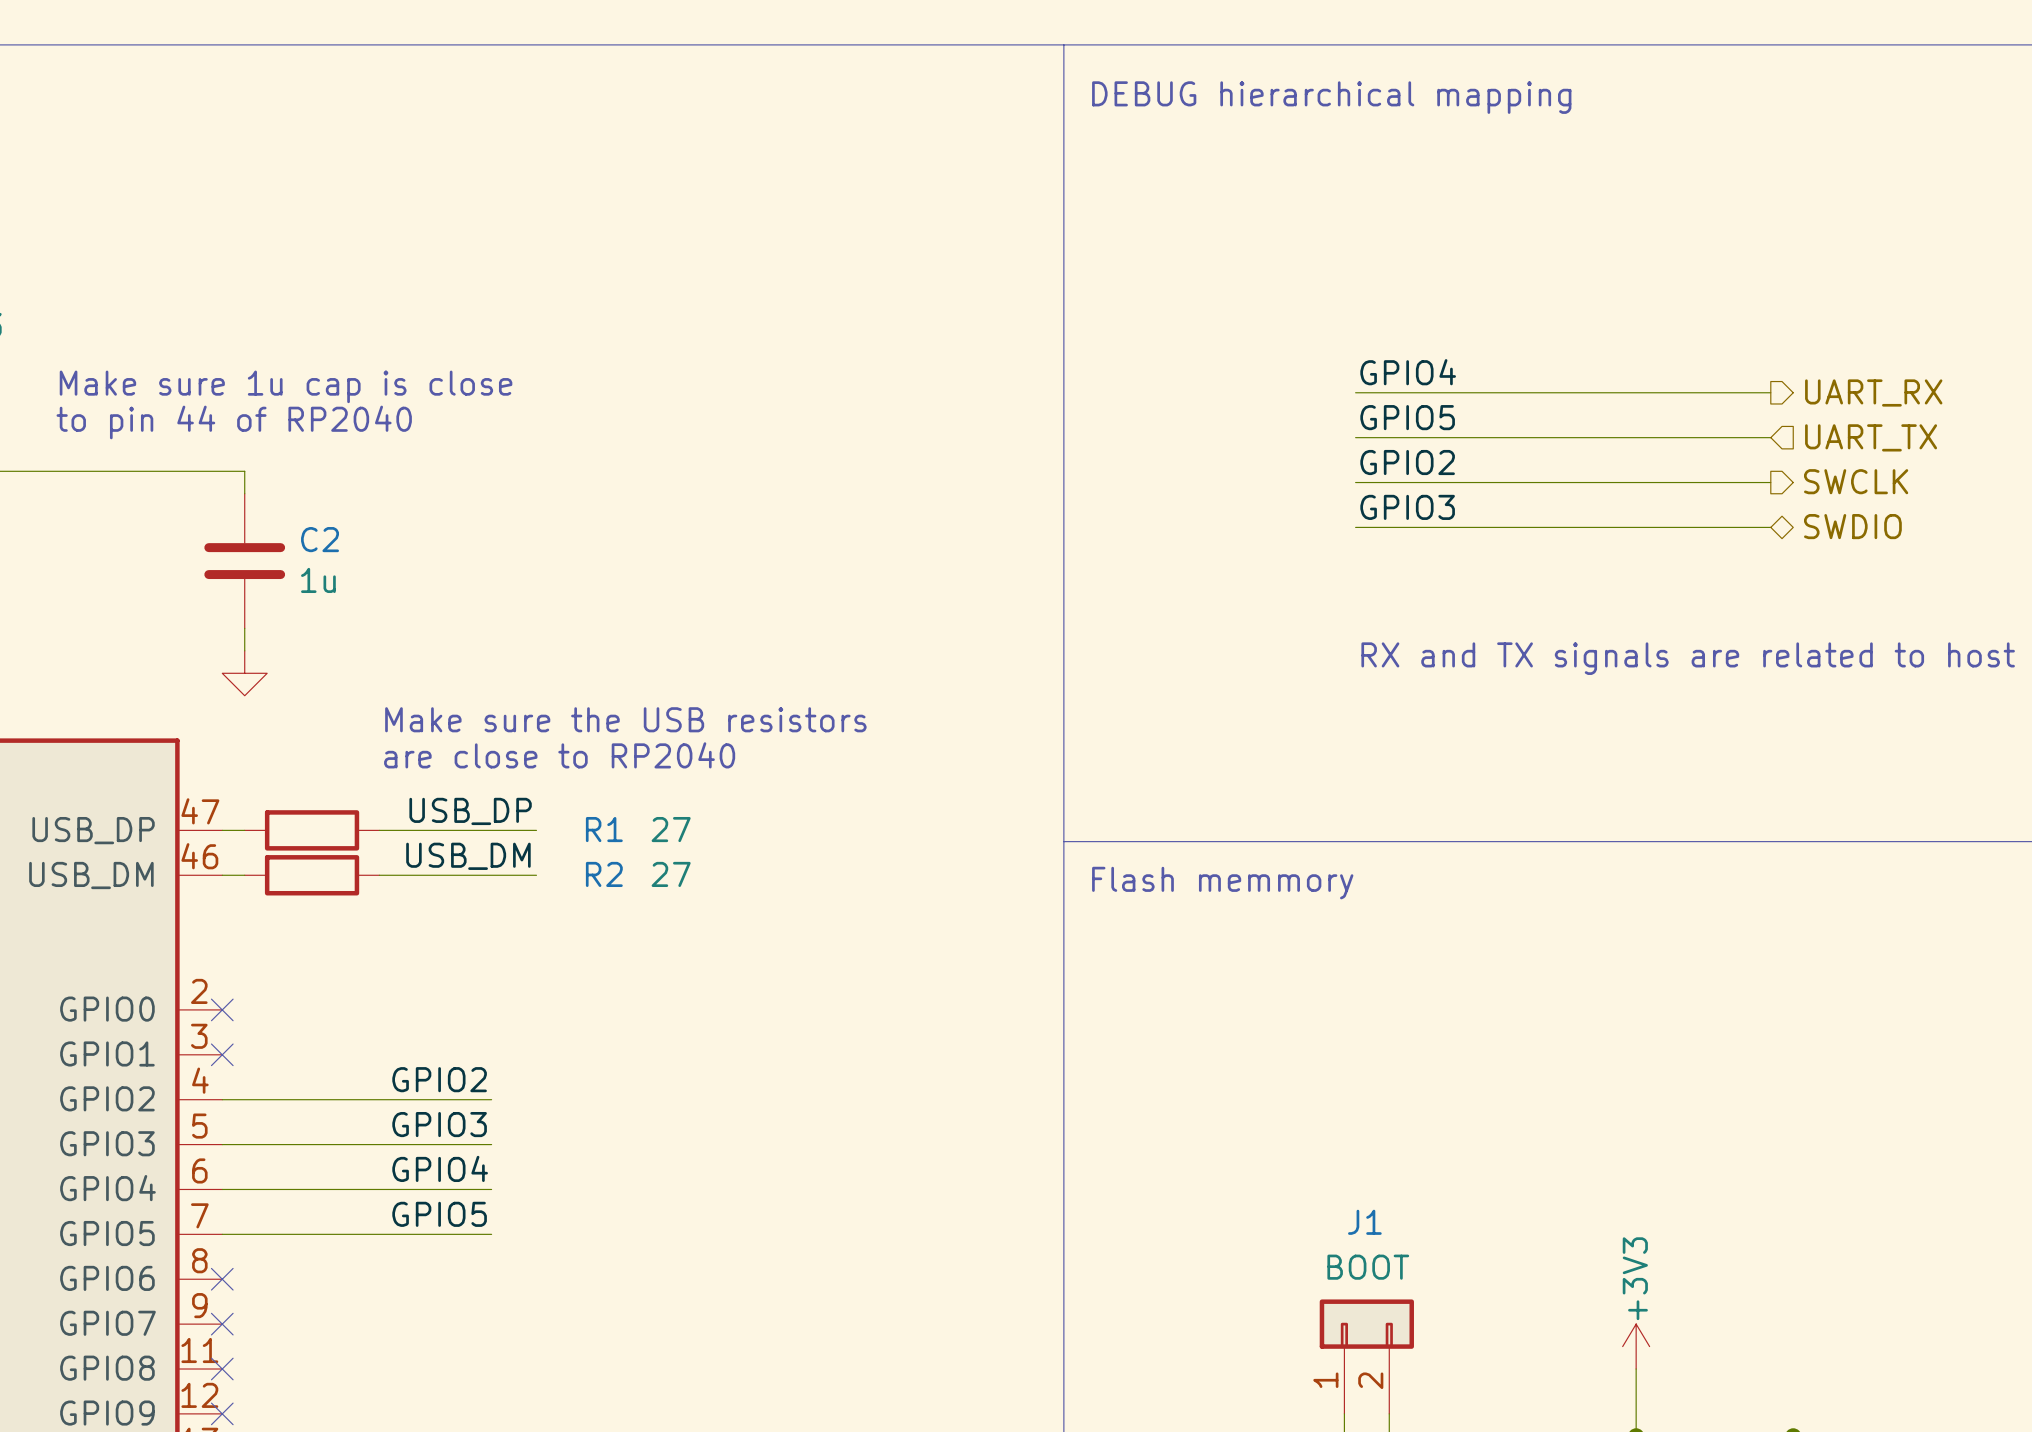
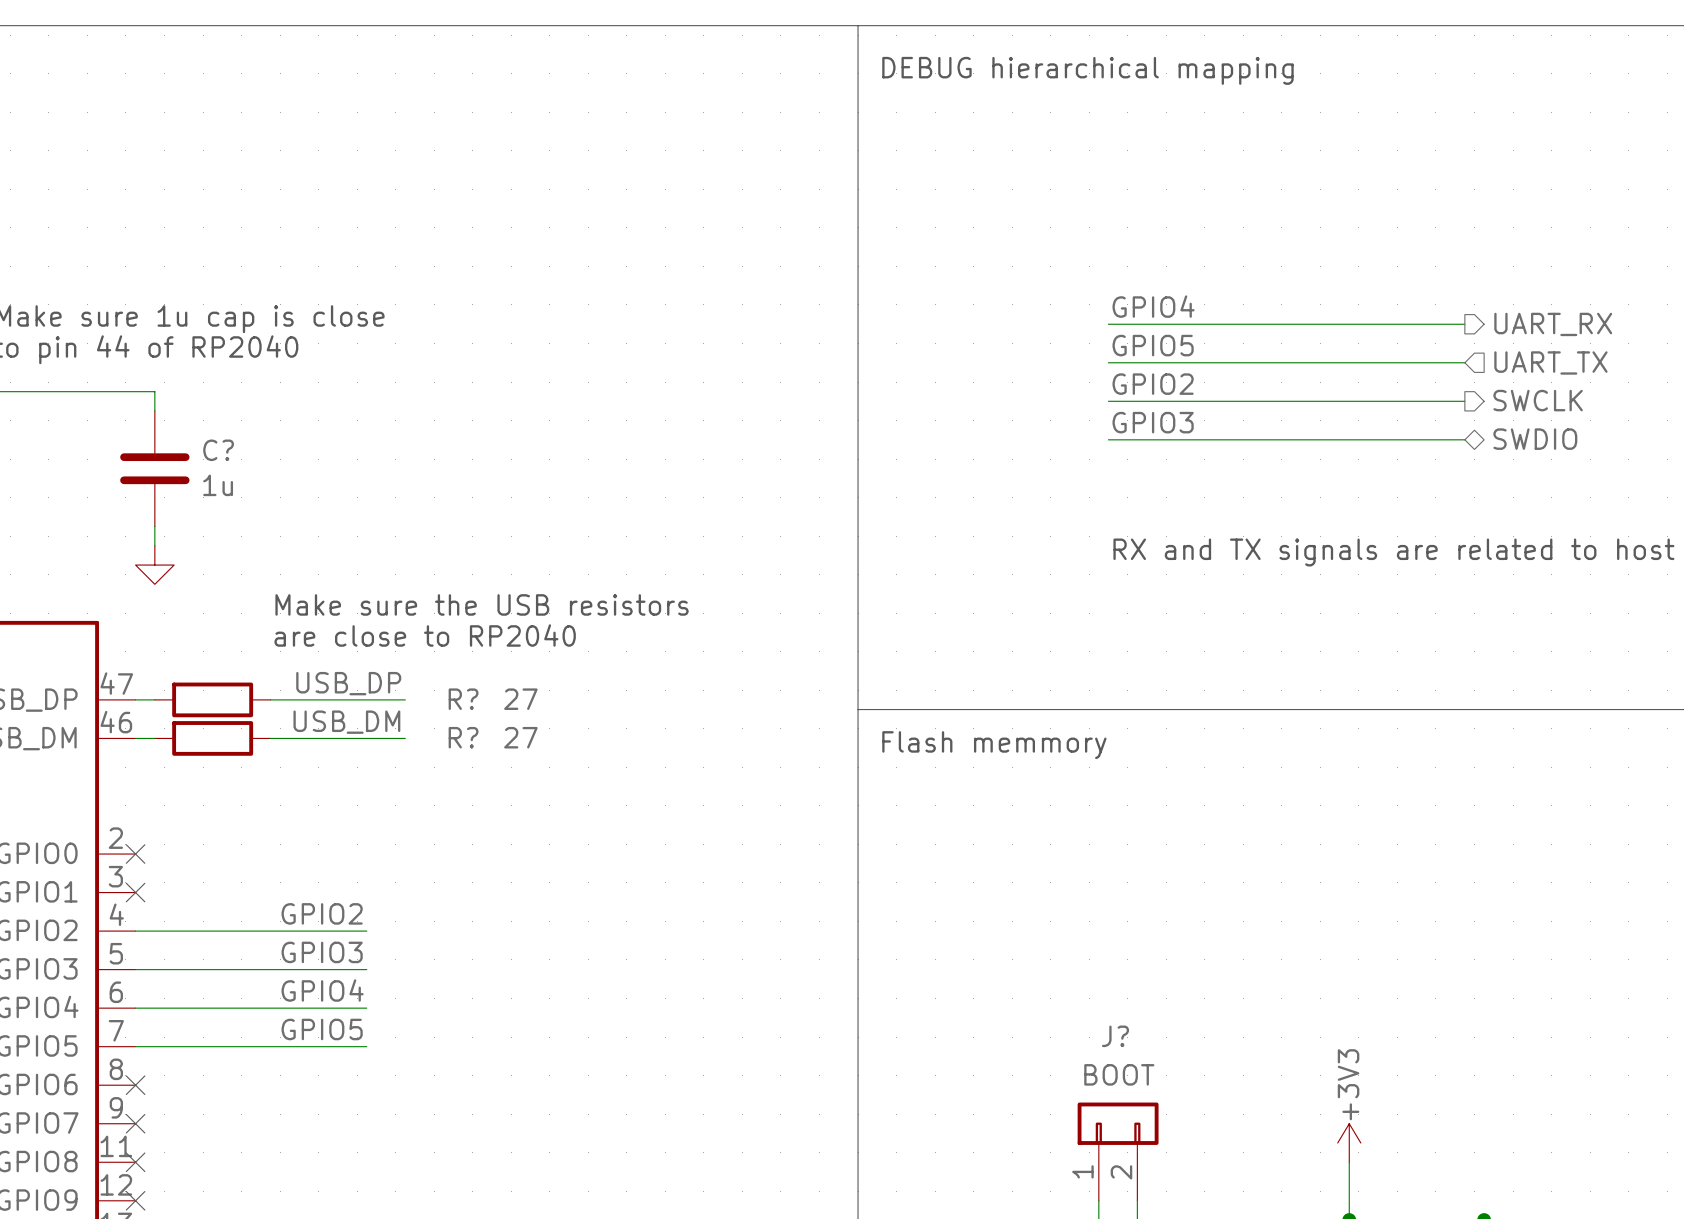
C2 name: C2 (320, 539) -> C? (218, 450)
R1 name: R1 (604, 829) -> R? (463, 699)
R2 name: R2 (604, 874) -> R? (463, 737)
J1 name: J1 (1364, 1222) -> J? (1115, 1036)

